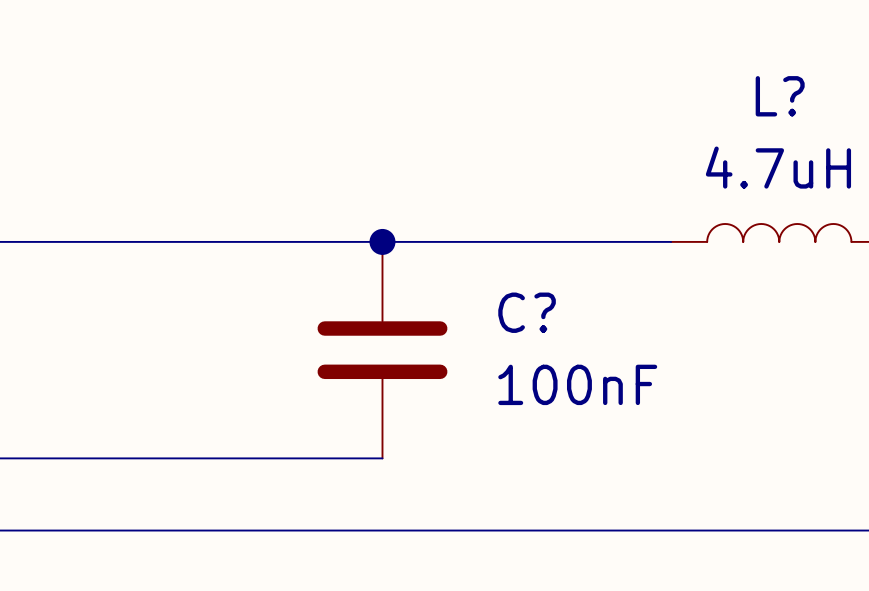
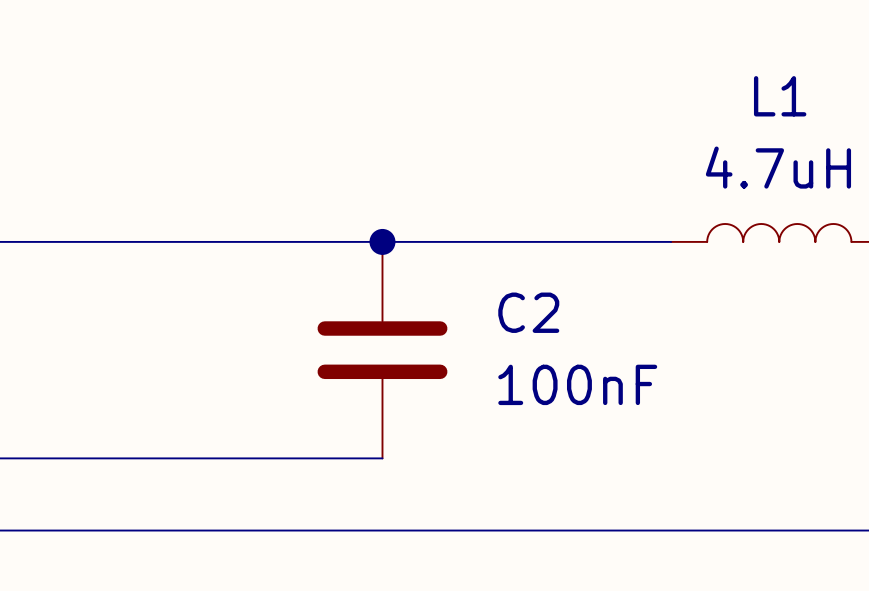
L? name: L? (780, 96) -> L1 (780, 96)
C? name: C? (527, 312) -> C2 (528, 312)

